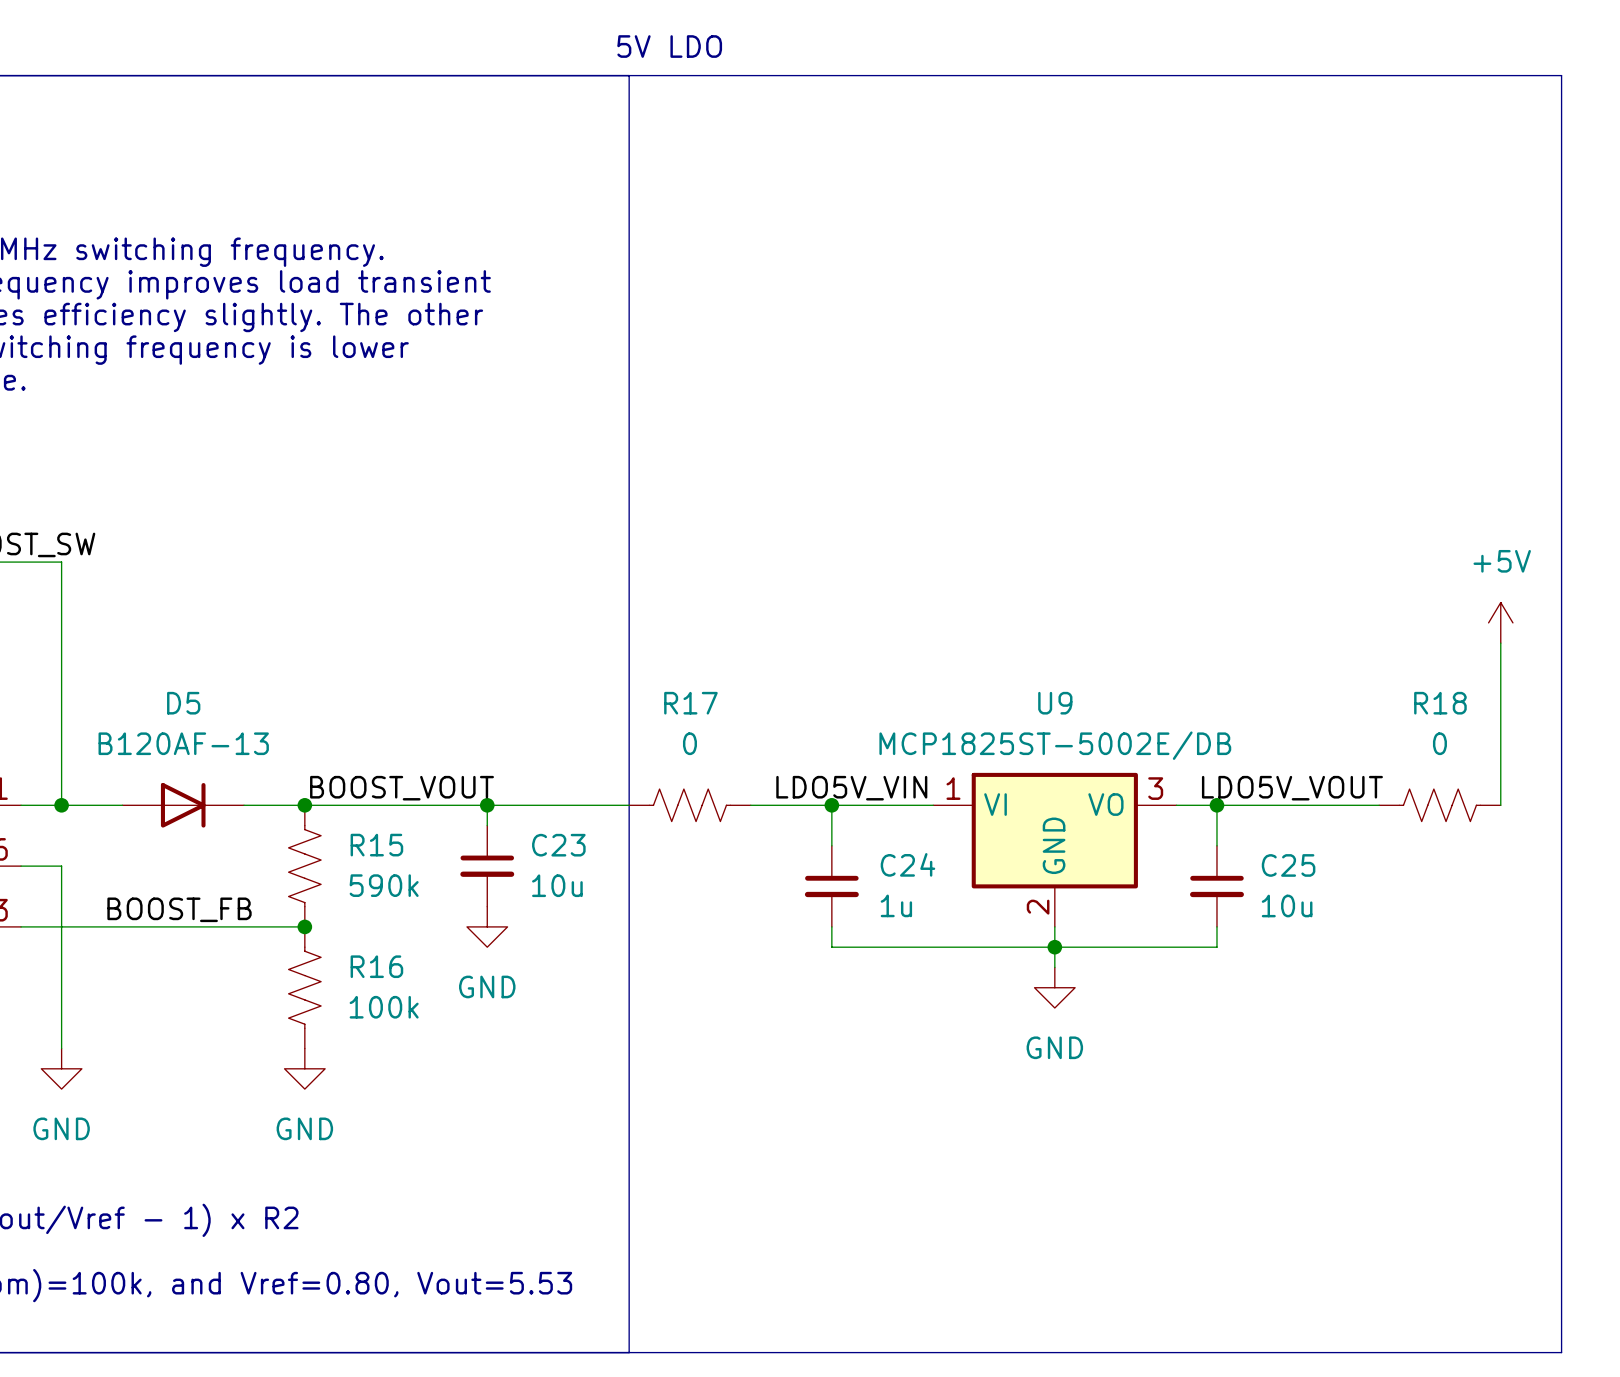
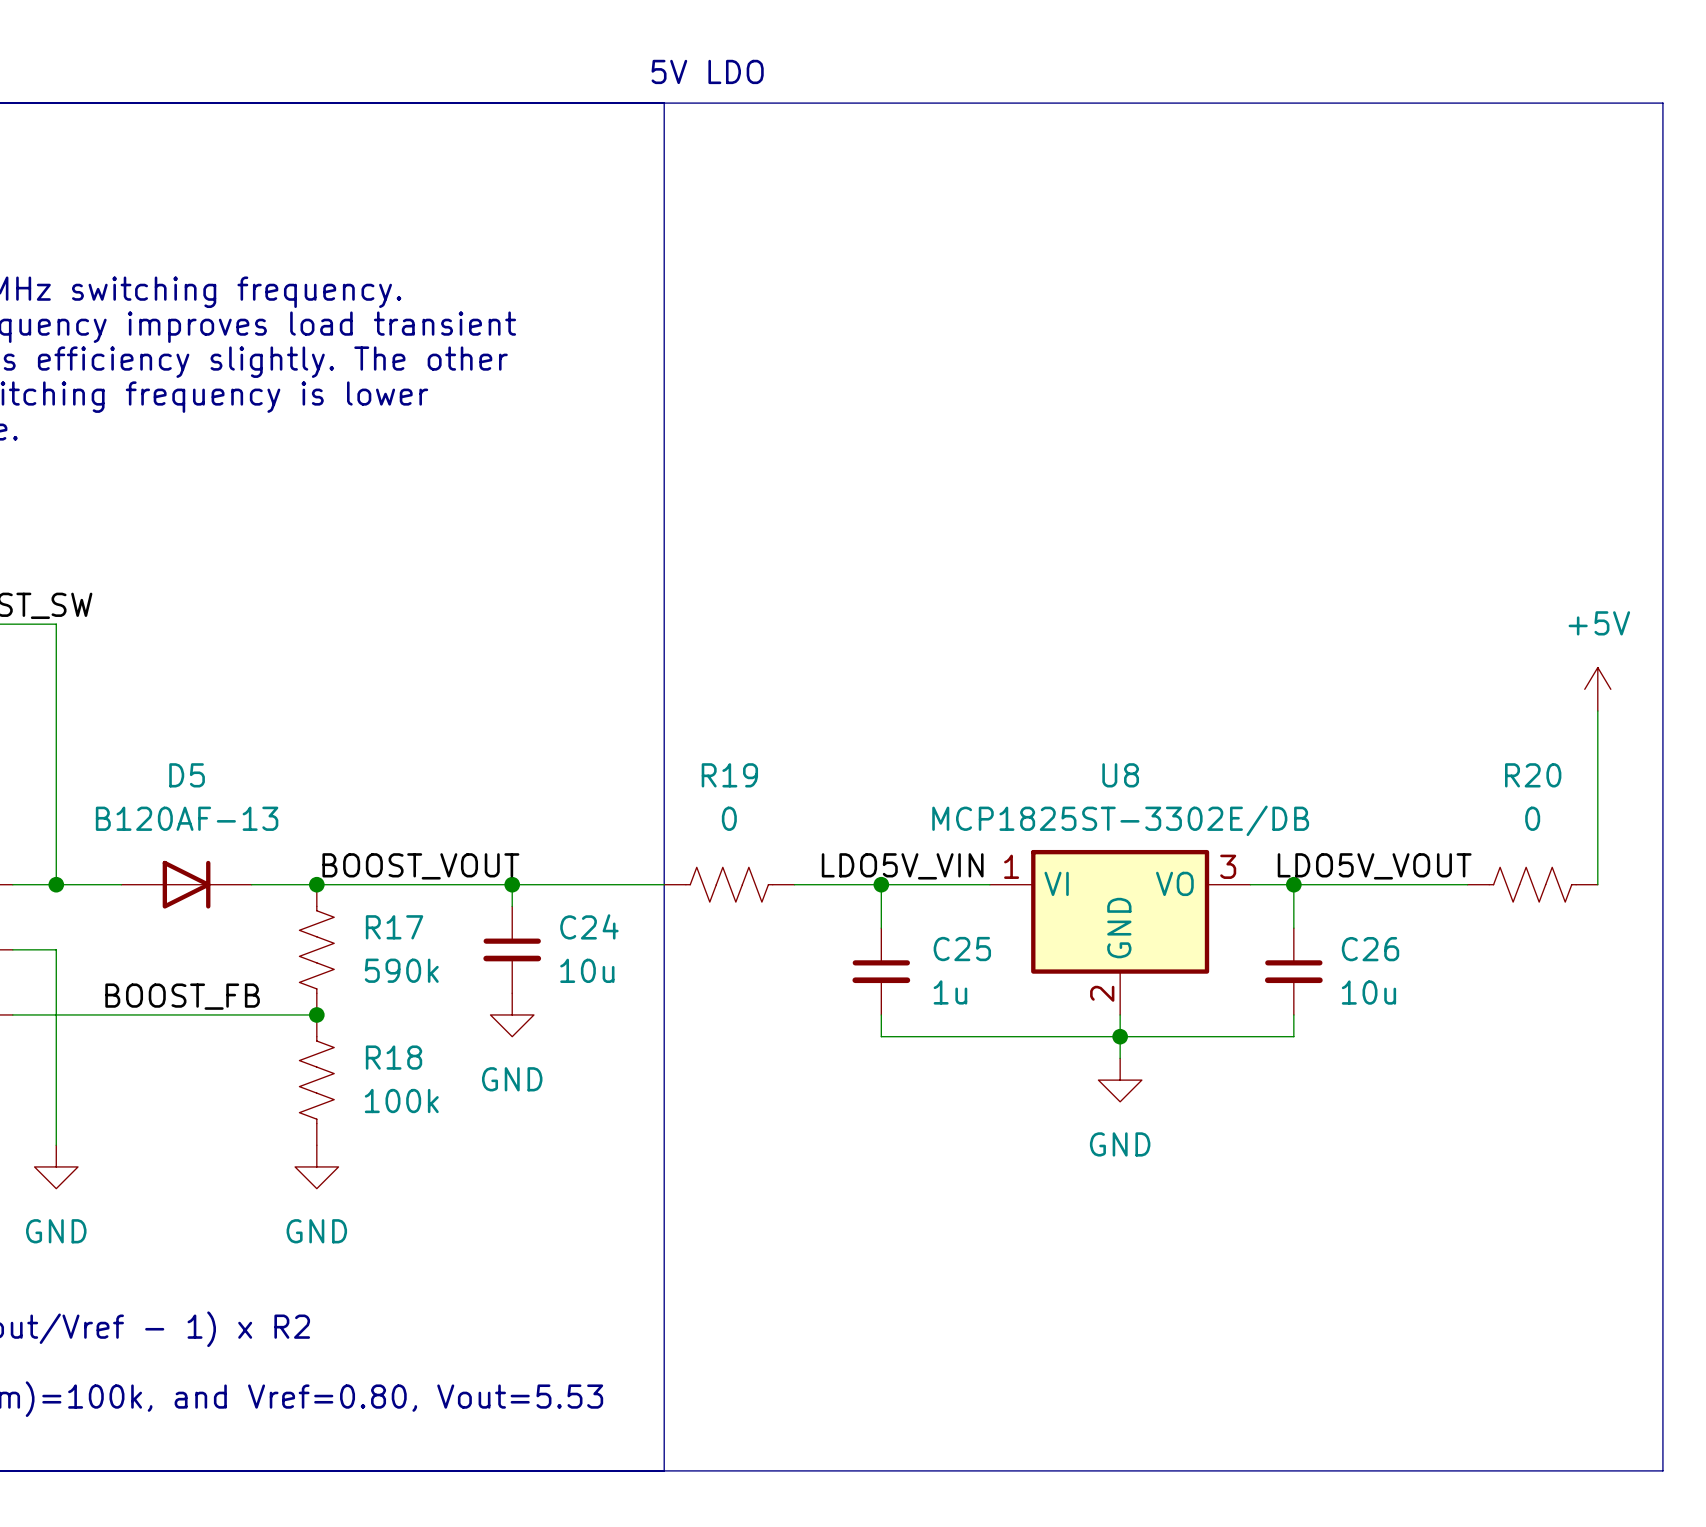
R17 name: R17 (690, 703) -> R19 (729, 775)
U9 name: U9 (1055, 703) -> U8 (1120, 775)
R18 name: R18 (1440, 703) -> R20 (1533, 775)
U9 value: MCP1825ST-5002E/DB (1055, 745) -> MCP1825ST-3302E/DB (1120, 820)
R15 name: R15 (376, 845) -> R17 (394, 927)
C23 name: C23 (558, 845) -> C24 (589, 926)
C24 name: C24 (907, 864) -> C25 (962, 949)
C25 name: C25 (1288, 865) -> C26 (1370, 949)
R16 name: R16 (376, 966) -> R18 (394, 1057)

